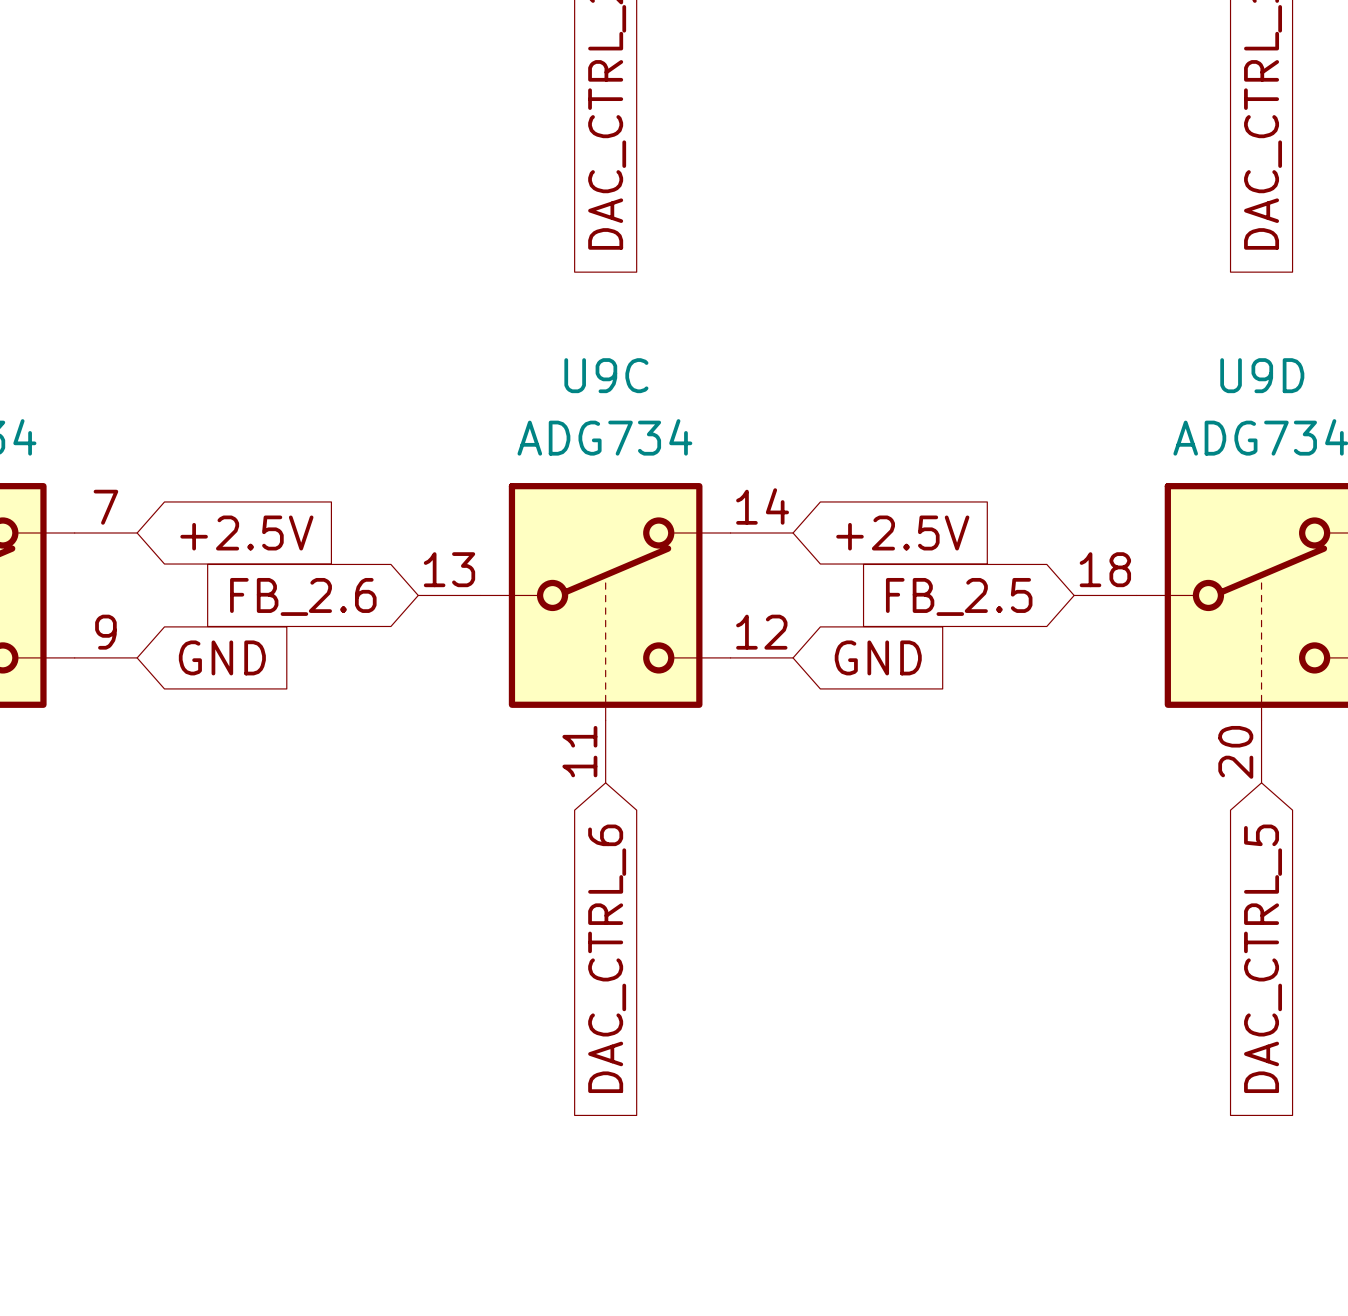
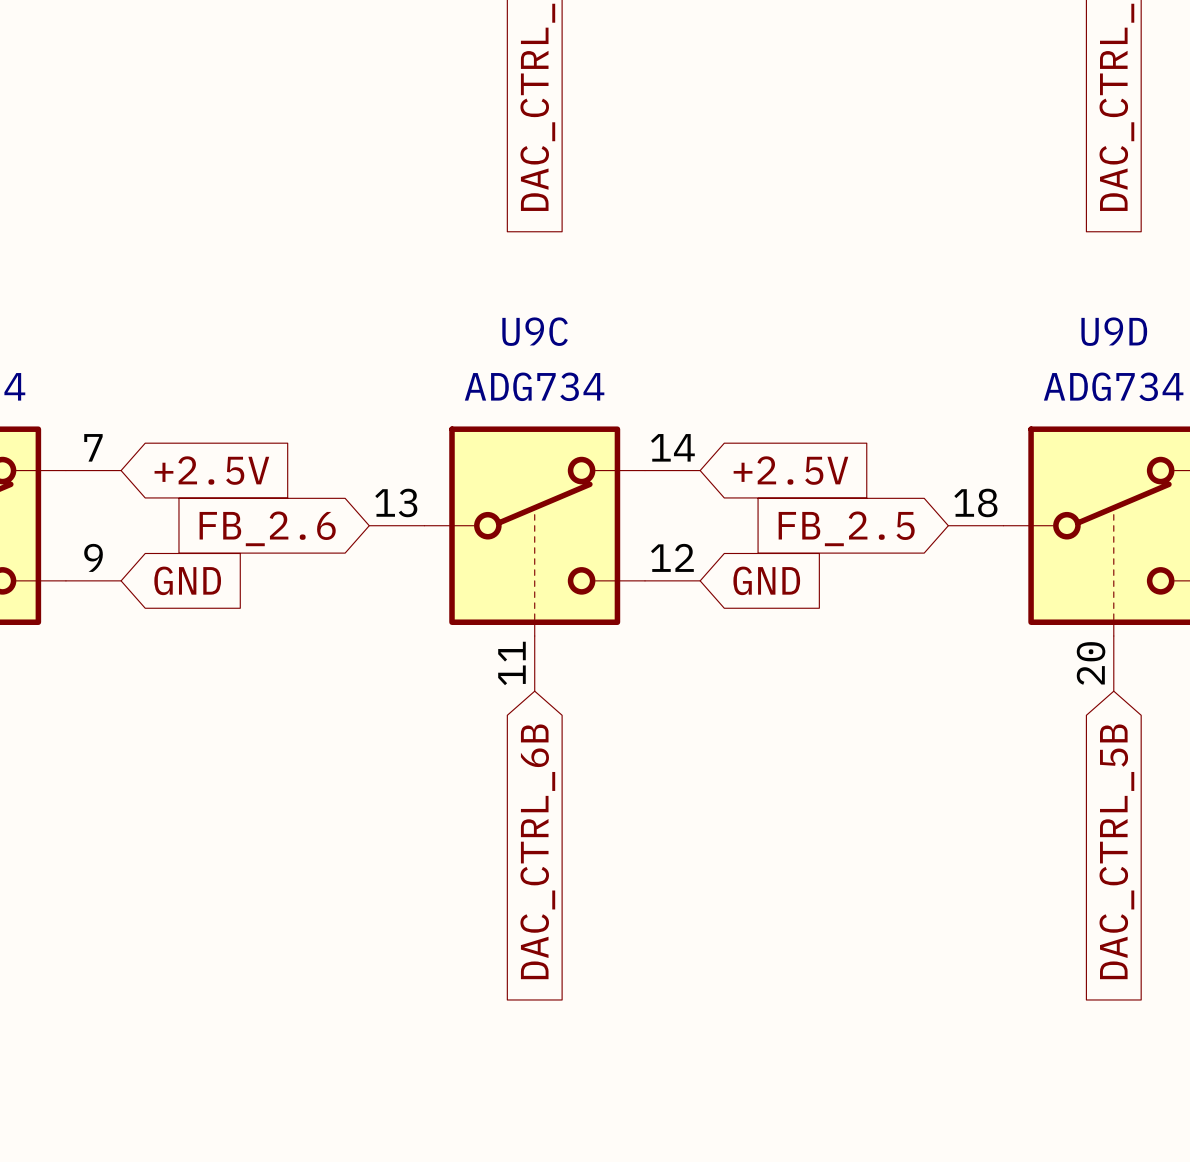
global label: DAC_CTRL_6 (607, 958) -> DAC_CTRL_6B (537, 851)
global label: DAC_CTRL_5 (1263, 958) -> DAC_CTRL_5B (1116, 851)

